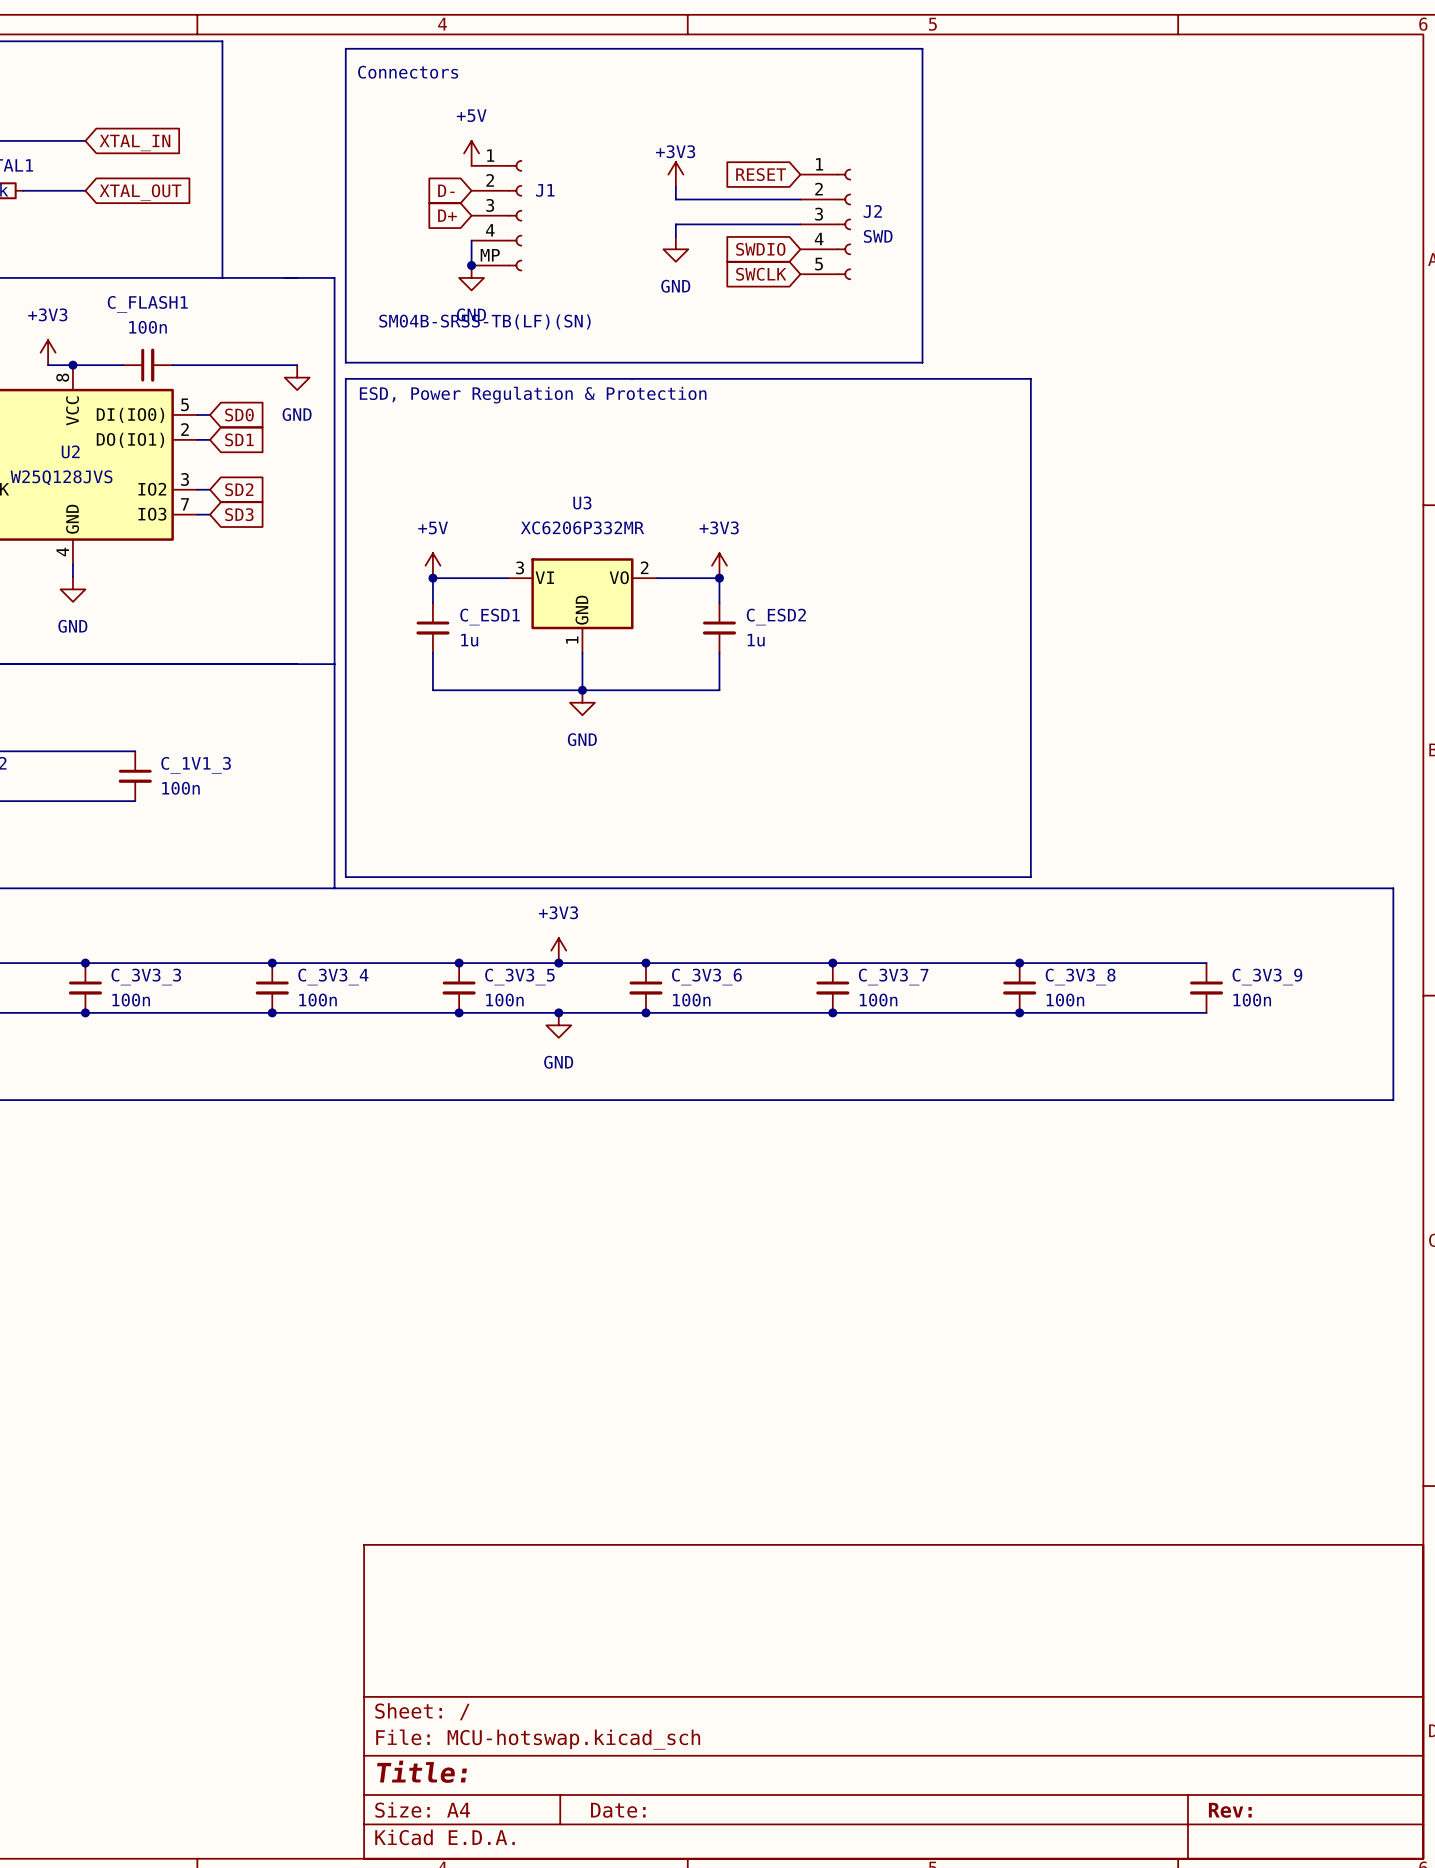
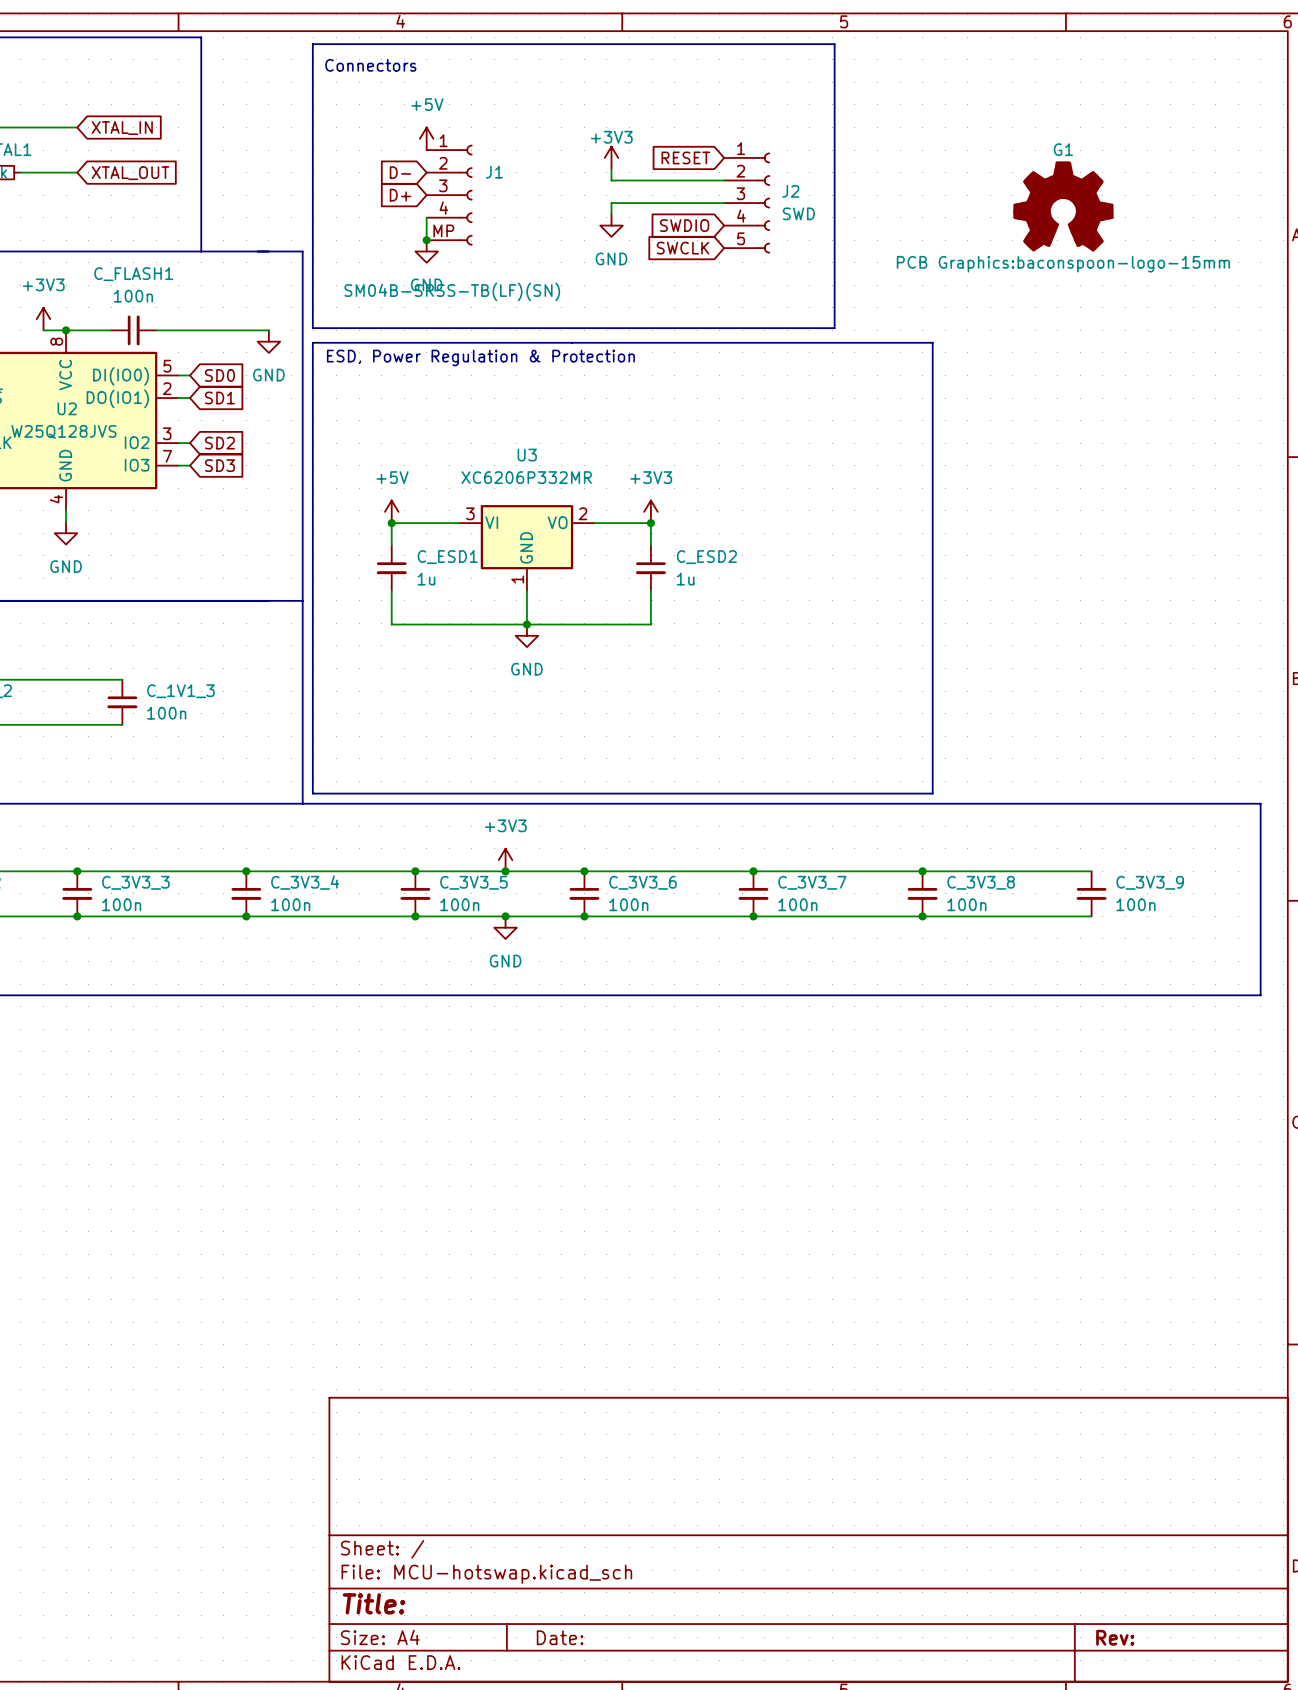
G1: none -> (1063, 206)

